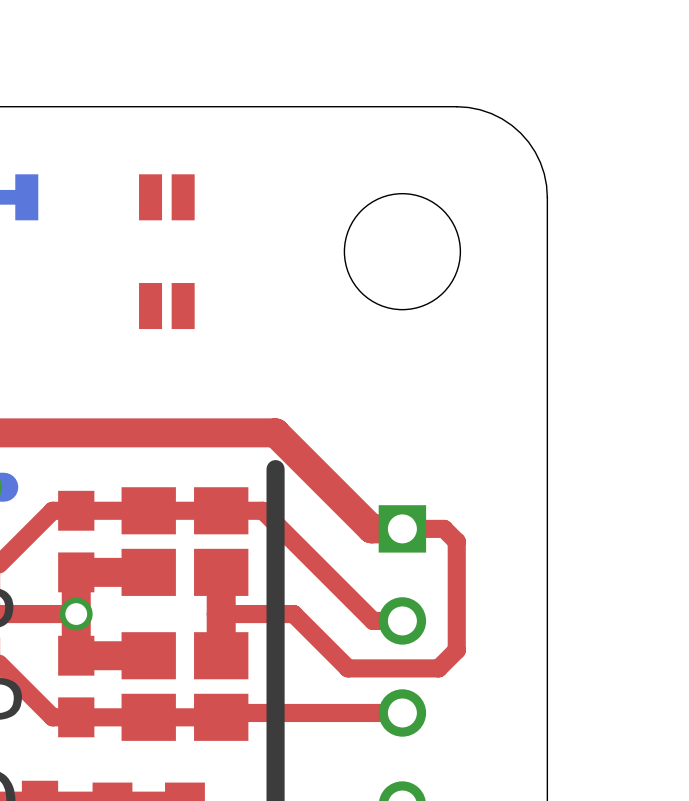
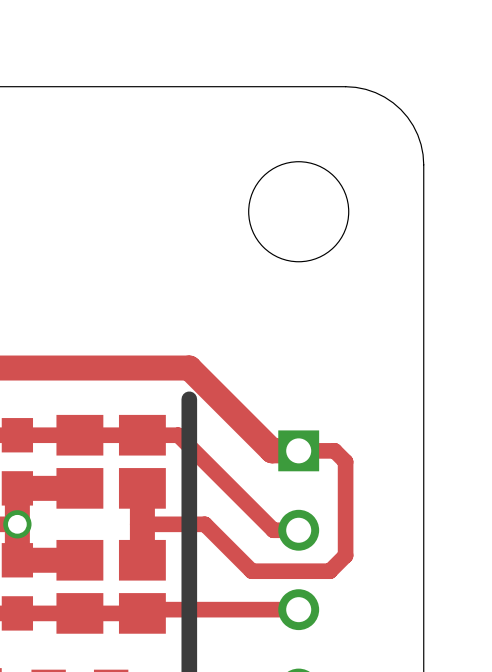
part: (166, 197) -> none
part: (166, 306) -> none

